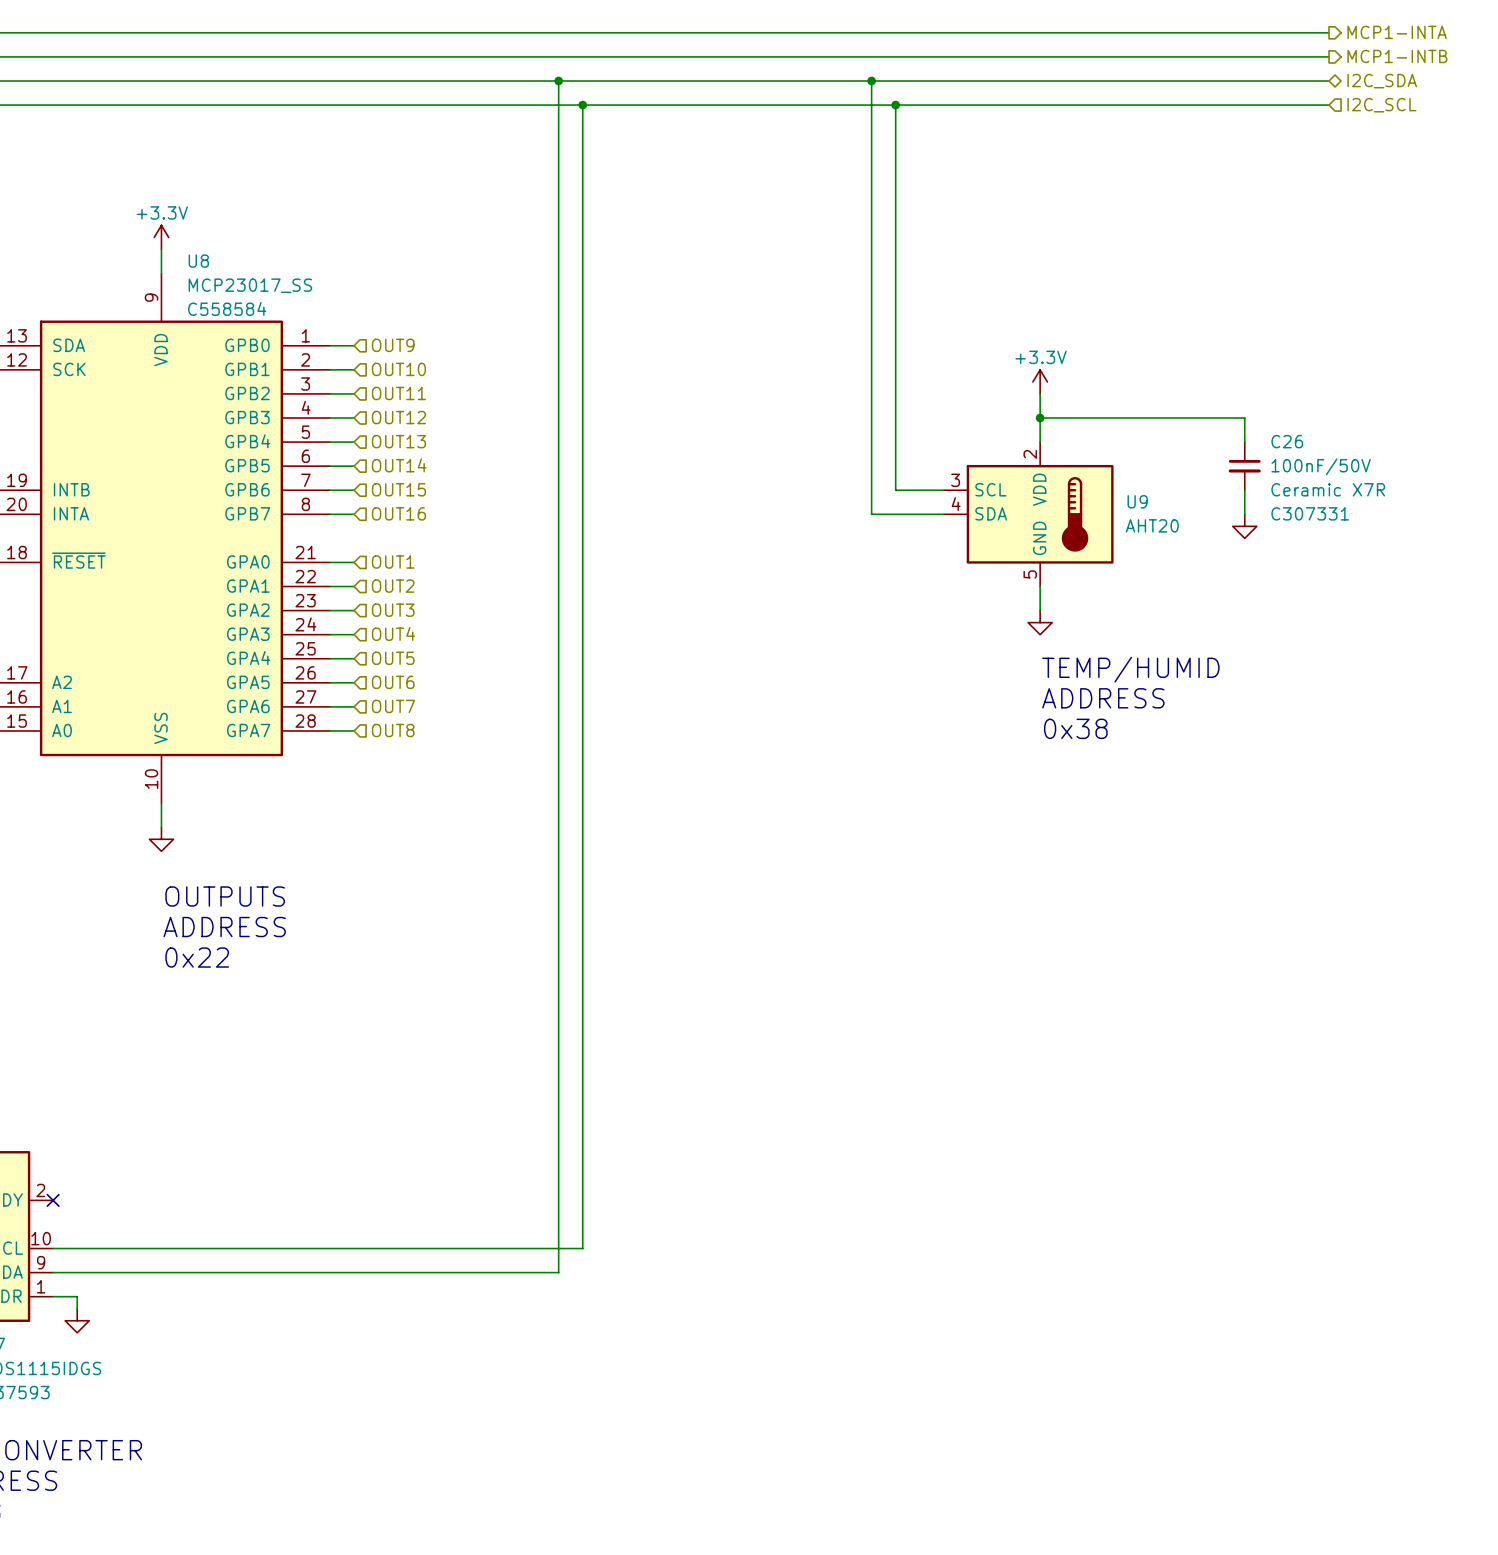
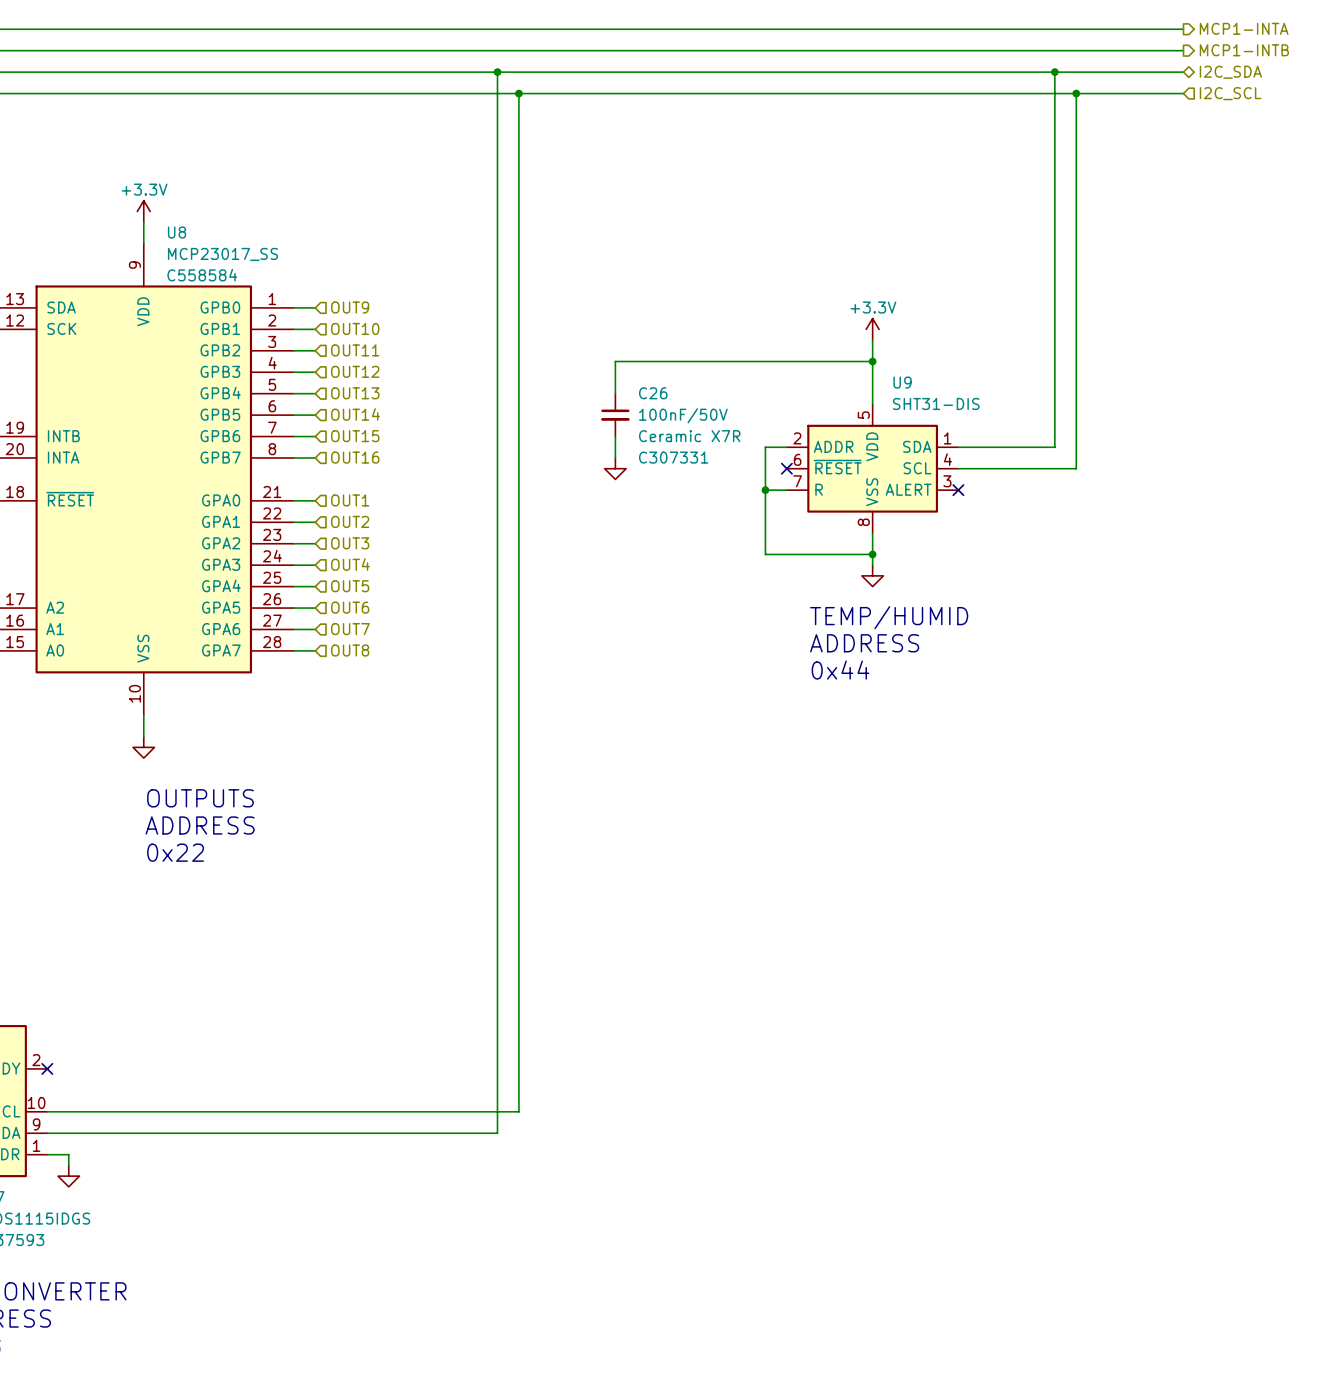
wire: (871, 80) (871, 514) (943, 514) -> none
junction: (871, 80) -> none
wire: none -> (1054, 72) (1054, 447) (958, 447)
junction: none -> (1054, 72)
wire: (895, 105) (895, 490) (943, 490) -> none
junction: (895, 105) -> none
wire: none -> (1076, 93) (1076, 468) (958, 468)
junction: none -> (1076, 93)
wire: none -> (872, 340) (872, 404)
power symbol position: +3.3V (1040, 381) -> +3.3V (872, 329)
wire: (1040, 393) (1040, 442) -> none
wire: none -> (872, 361) (615, 361) (615, 393)
junction: none -> (872, 361)
wire: (1040, 418) (1244, 418) (1244, 442) -> none
junction: (1040, 418) -> none
U9 symbol: [943, 442, 1114, 587] -> [786, 404, 959, 534]
C26 position: (1244, 466) -> (615, 415)
wire: none -> (615, 436) (615, 457)
wire: (1244, 490) (1244, 514) -> none
U9 name position: U9 (1137, 501) -> U9 (902, 382)
wire: none -> (786, 447) (765, 447) (765, 554) (872, 554)
U9 value: AHT20 (1152, 525) -> SHT31-DIS (936, 403)
power symbol: none -> (615, 468)
no-connect mark: none -> (786, 468)
power symbol: (1244, 526) -> none
wire: none -> (765, 490) (786, 490)
junction: none -> (765, 490)
no-connect mark: none -> (958, 490)
wire: (1040, 586) (1040, 610) -> none
wire: none -> (872, 533) (872, 565)
junction: none -> (872, 554)
power symbol position: (1040, 622) -> (872, 575)
text position: TEMP/HUMID (1130, 669) -> TEMP/HUMID (889, 617)
text position: ADDRESS (1103, 698) -> ADDRESS (864, 643)
text: 0x38 (1075, 728) -> none
text: none -> 0x44 (840, 670)

